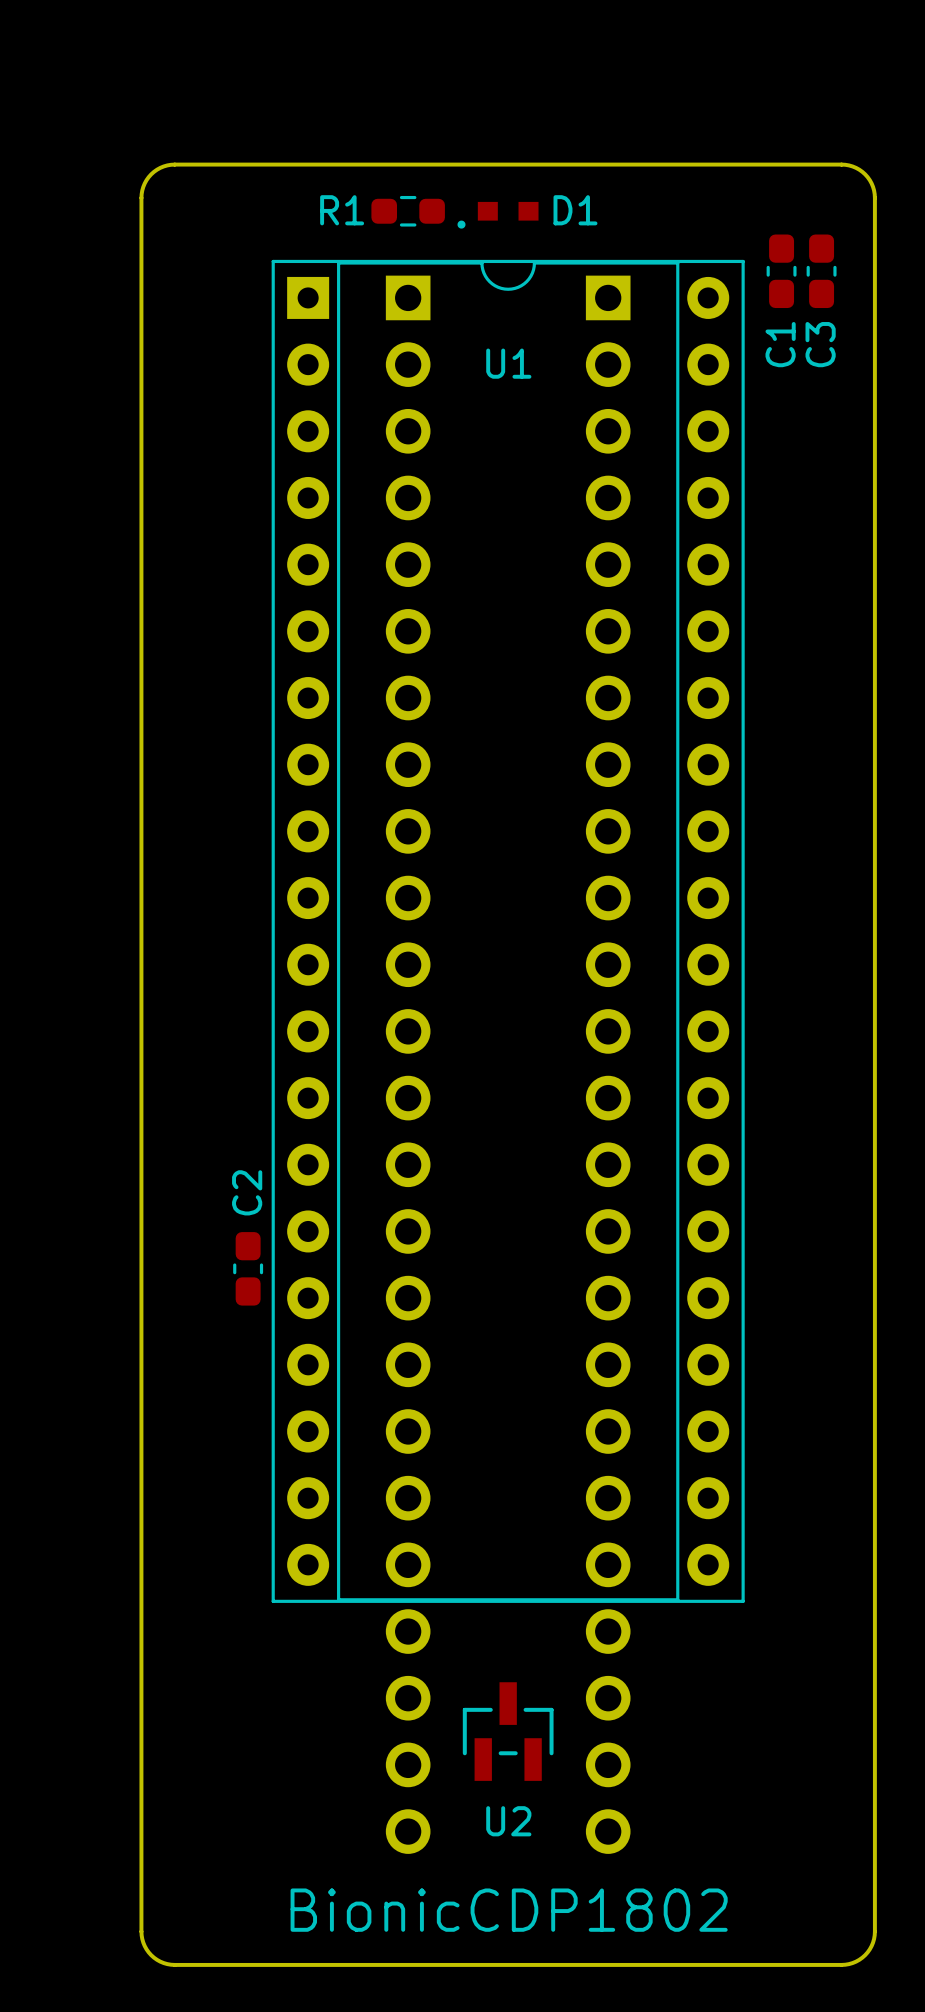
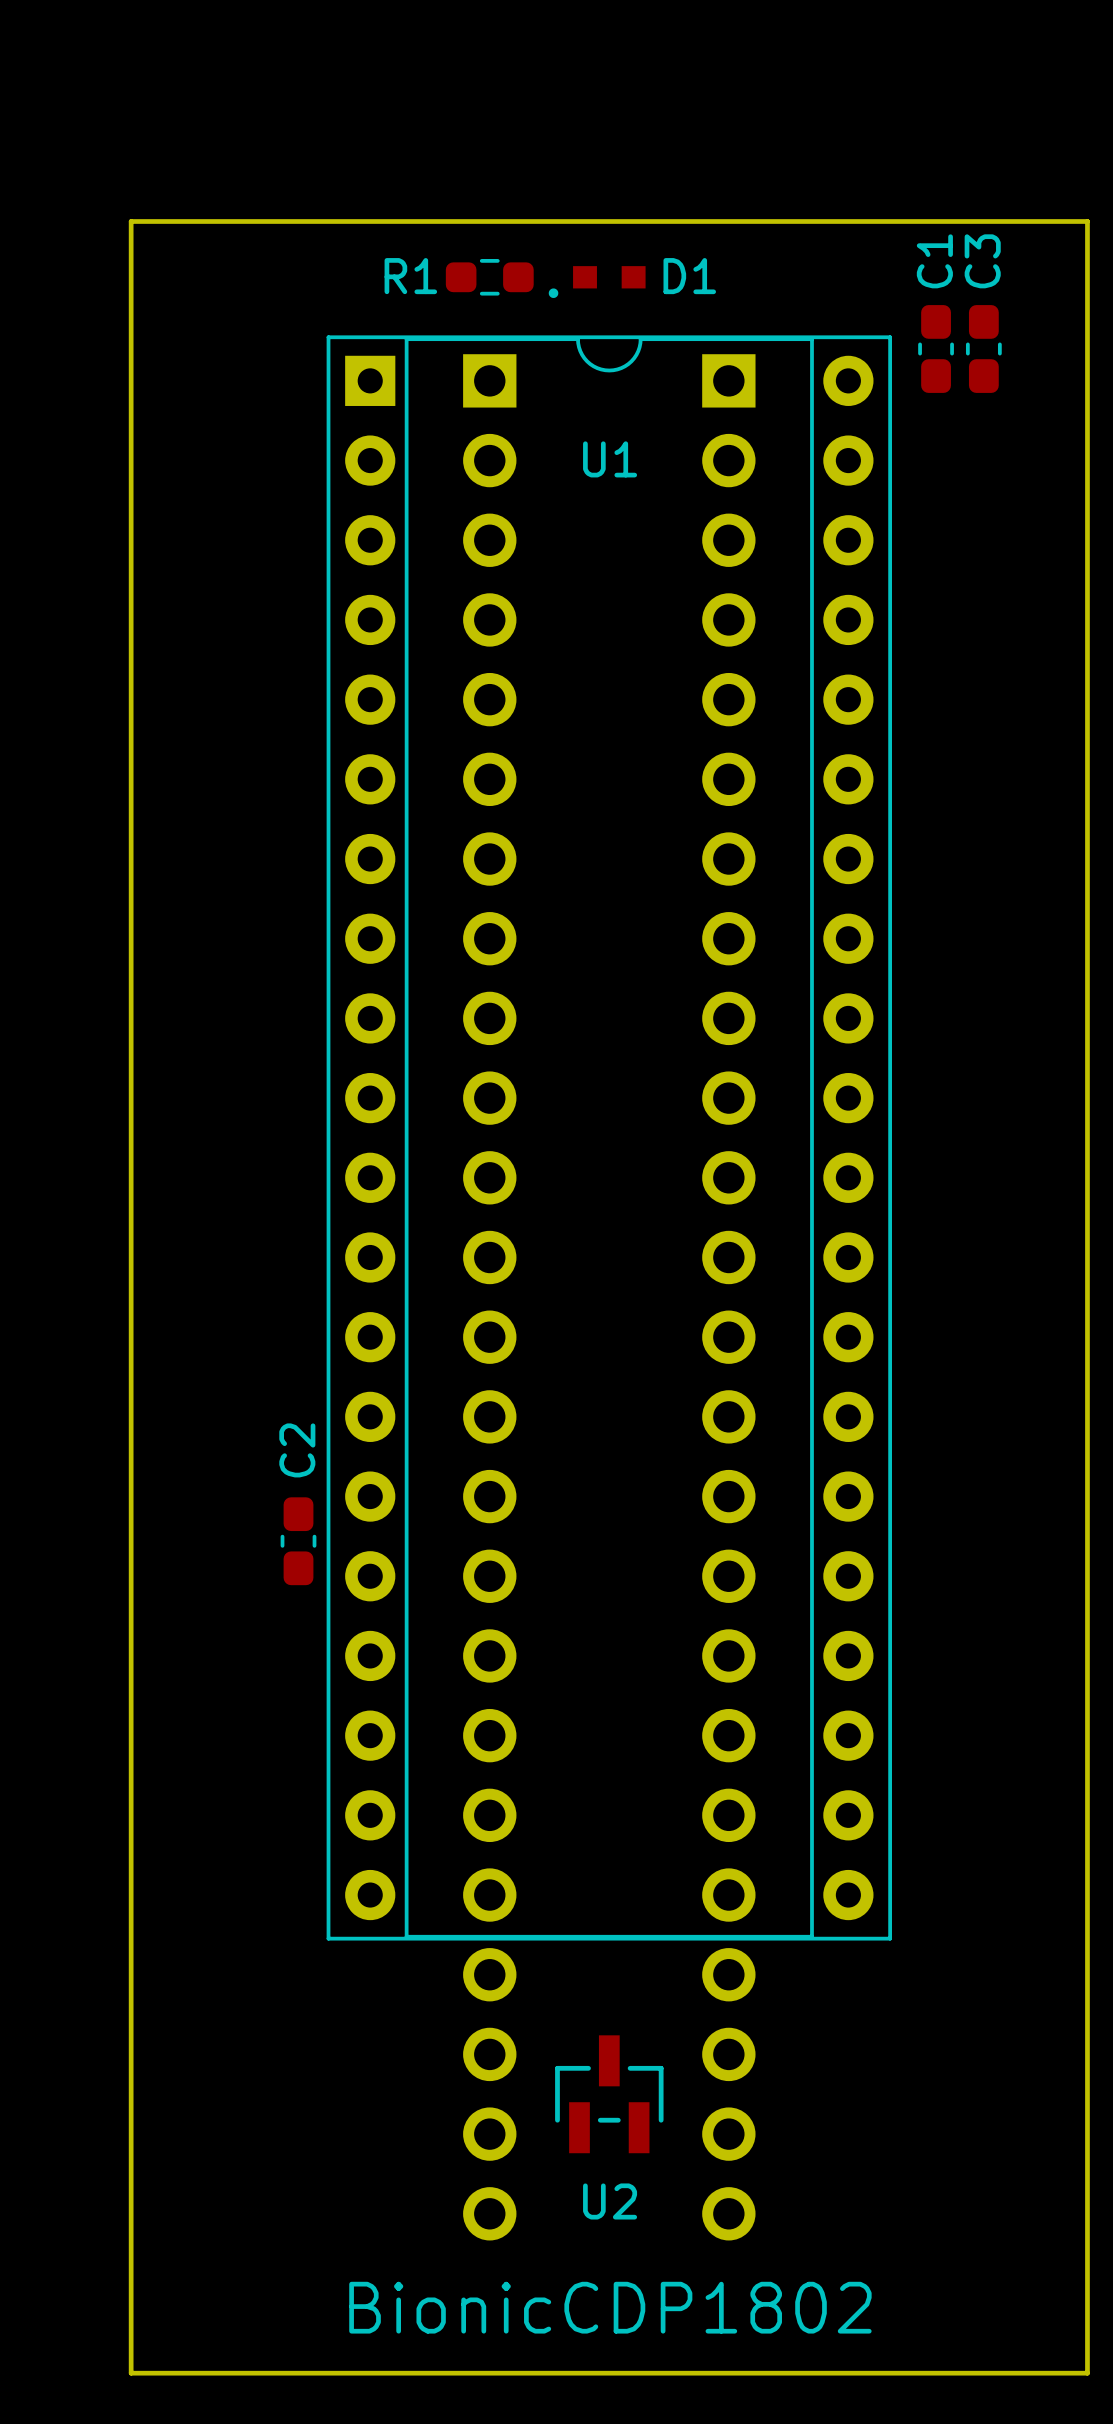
board edge: (174, 164) (163, 166) (151, 174) (143, 186) (141, 197) (141, 1931) (143, 1942) (151, 1955) (163, 1963) (174, 1964) -> (210, 221) (131, 221) (131, 2373) (210, 2373)
board edge: (841, 164) (852, 166) (865, 174) (873, 186) (874, 197) (874, 1931) (873, 1942) (865, 1955) (852, 1963) (841, 1964) -> (1007, 221) (1087, 221) (1087, 2373) (1007, 2373)
C1 name position: C1 (780, 344) -> C1 (934, 261)
C3 name position: C3 (820, 344) -> C3 (982, 261)

